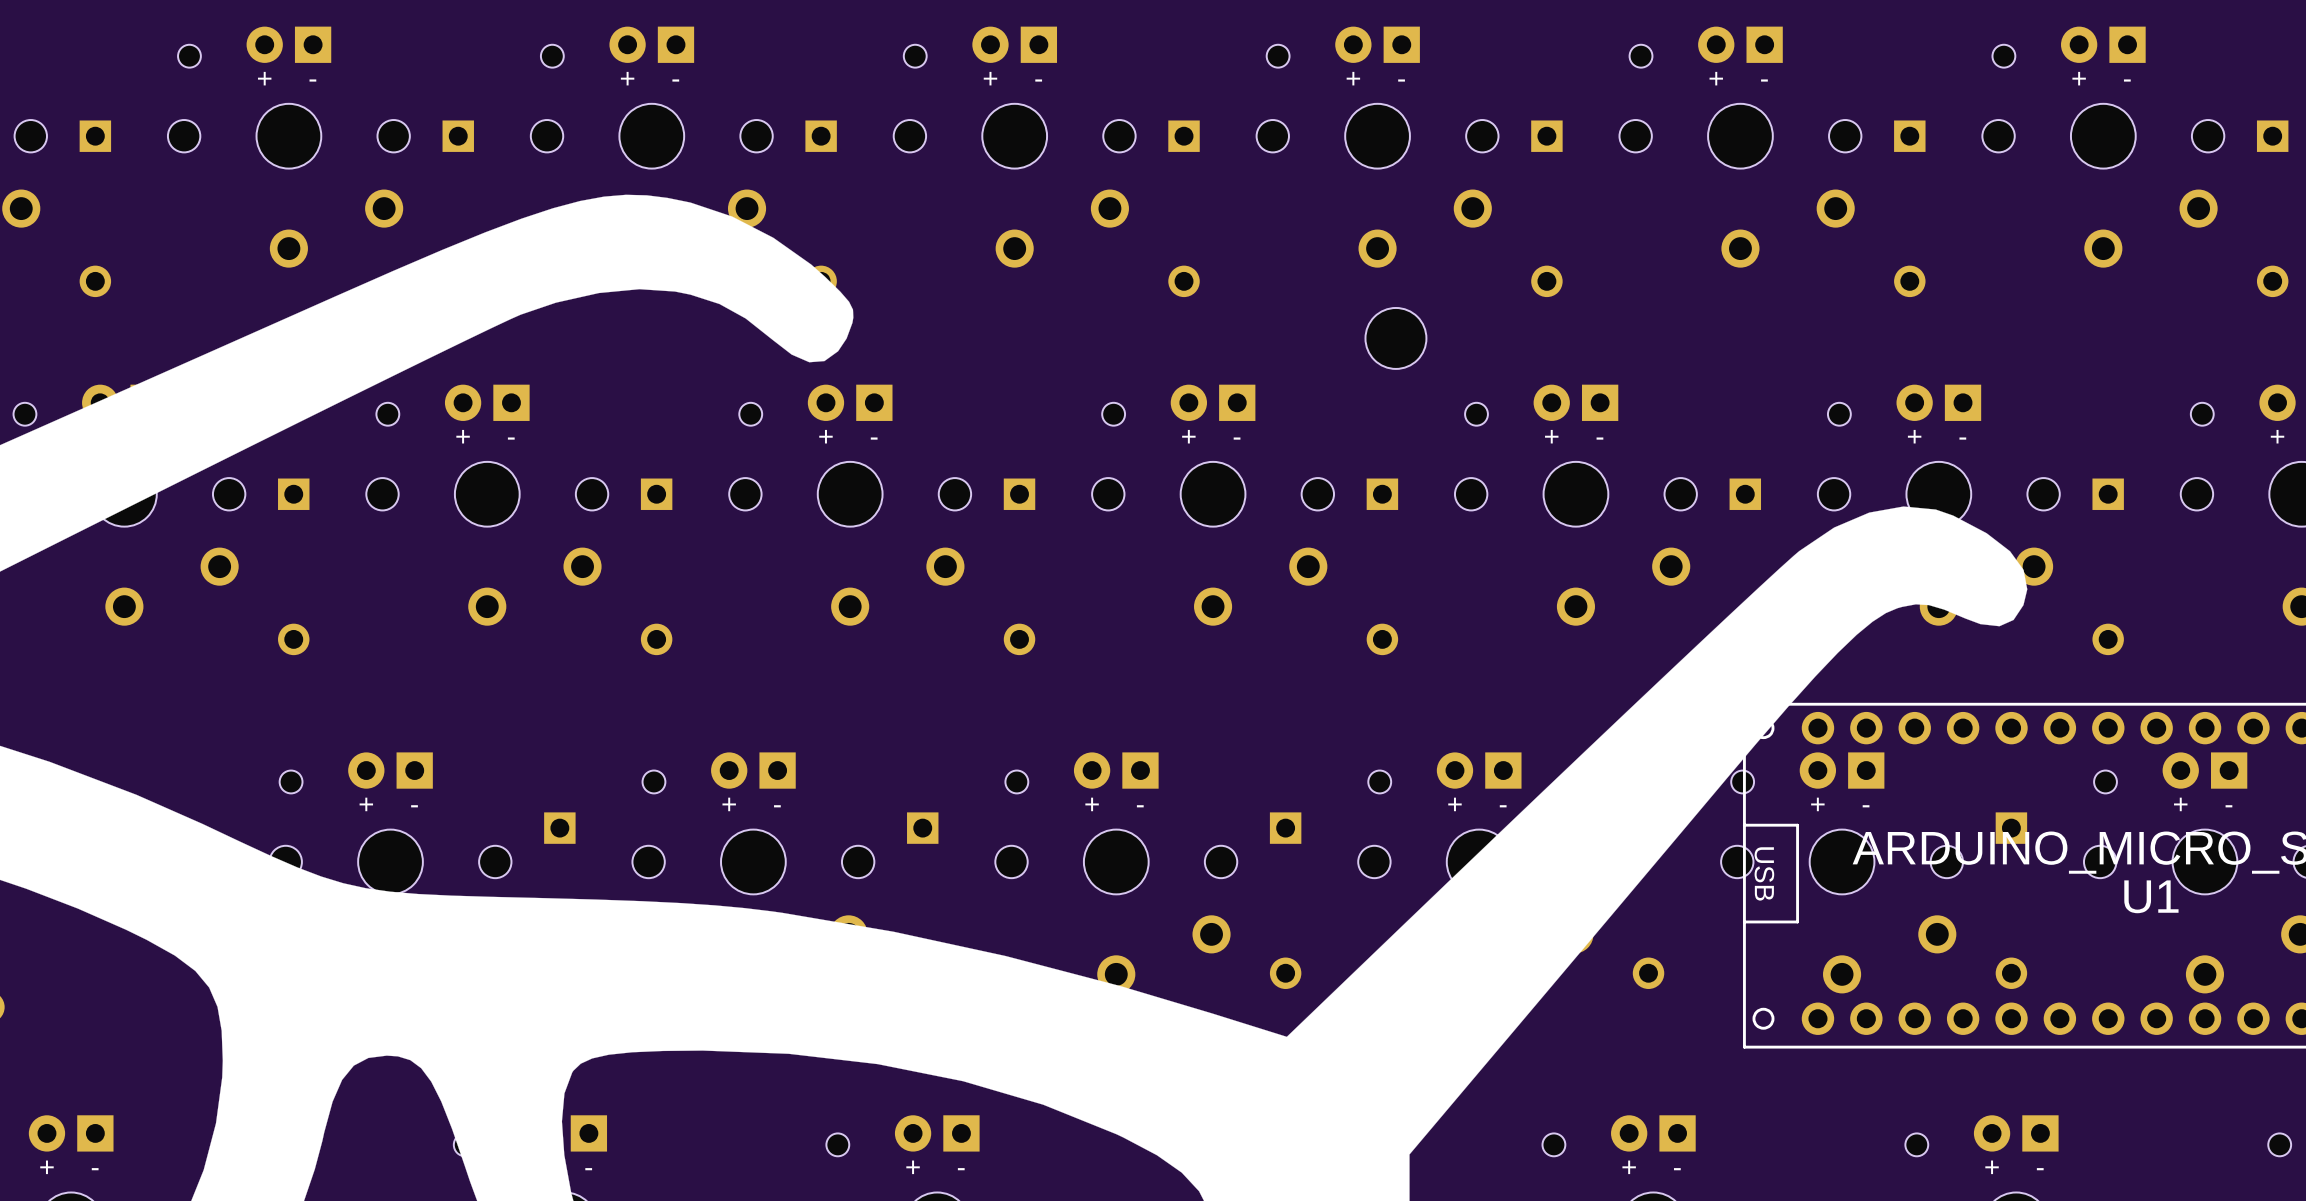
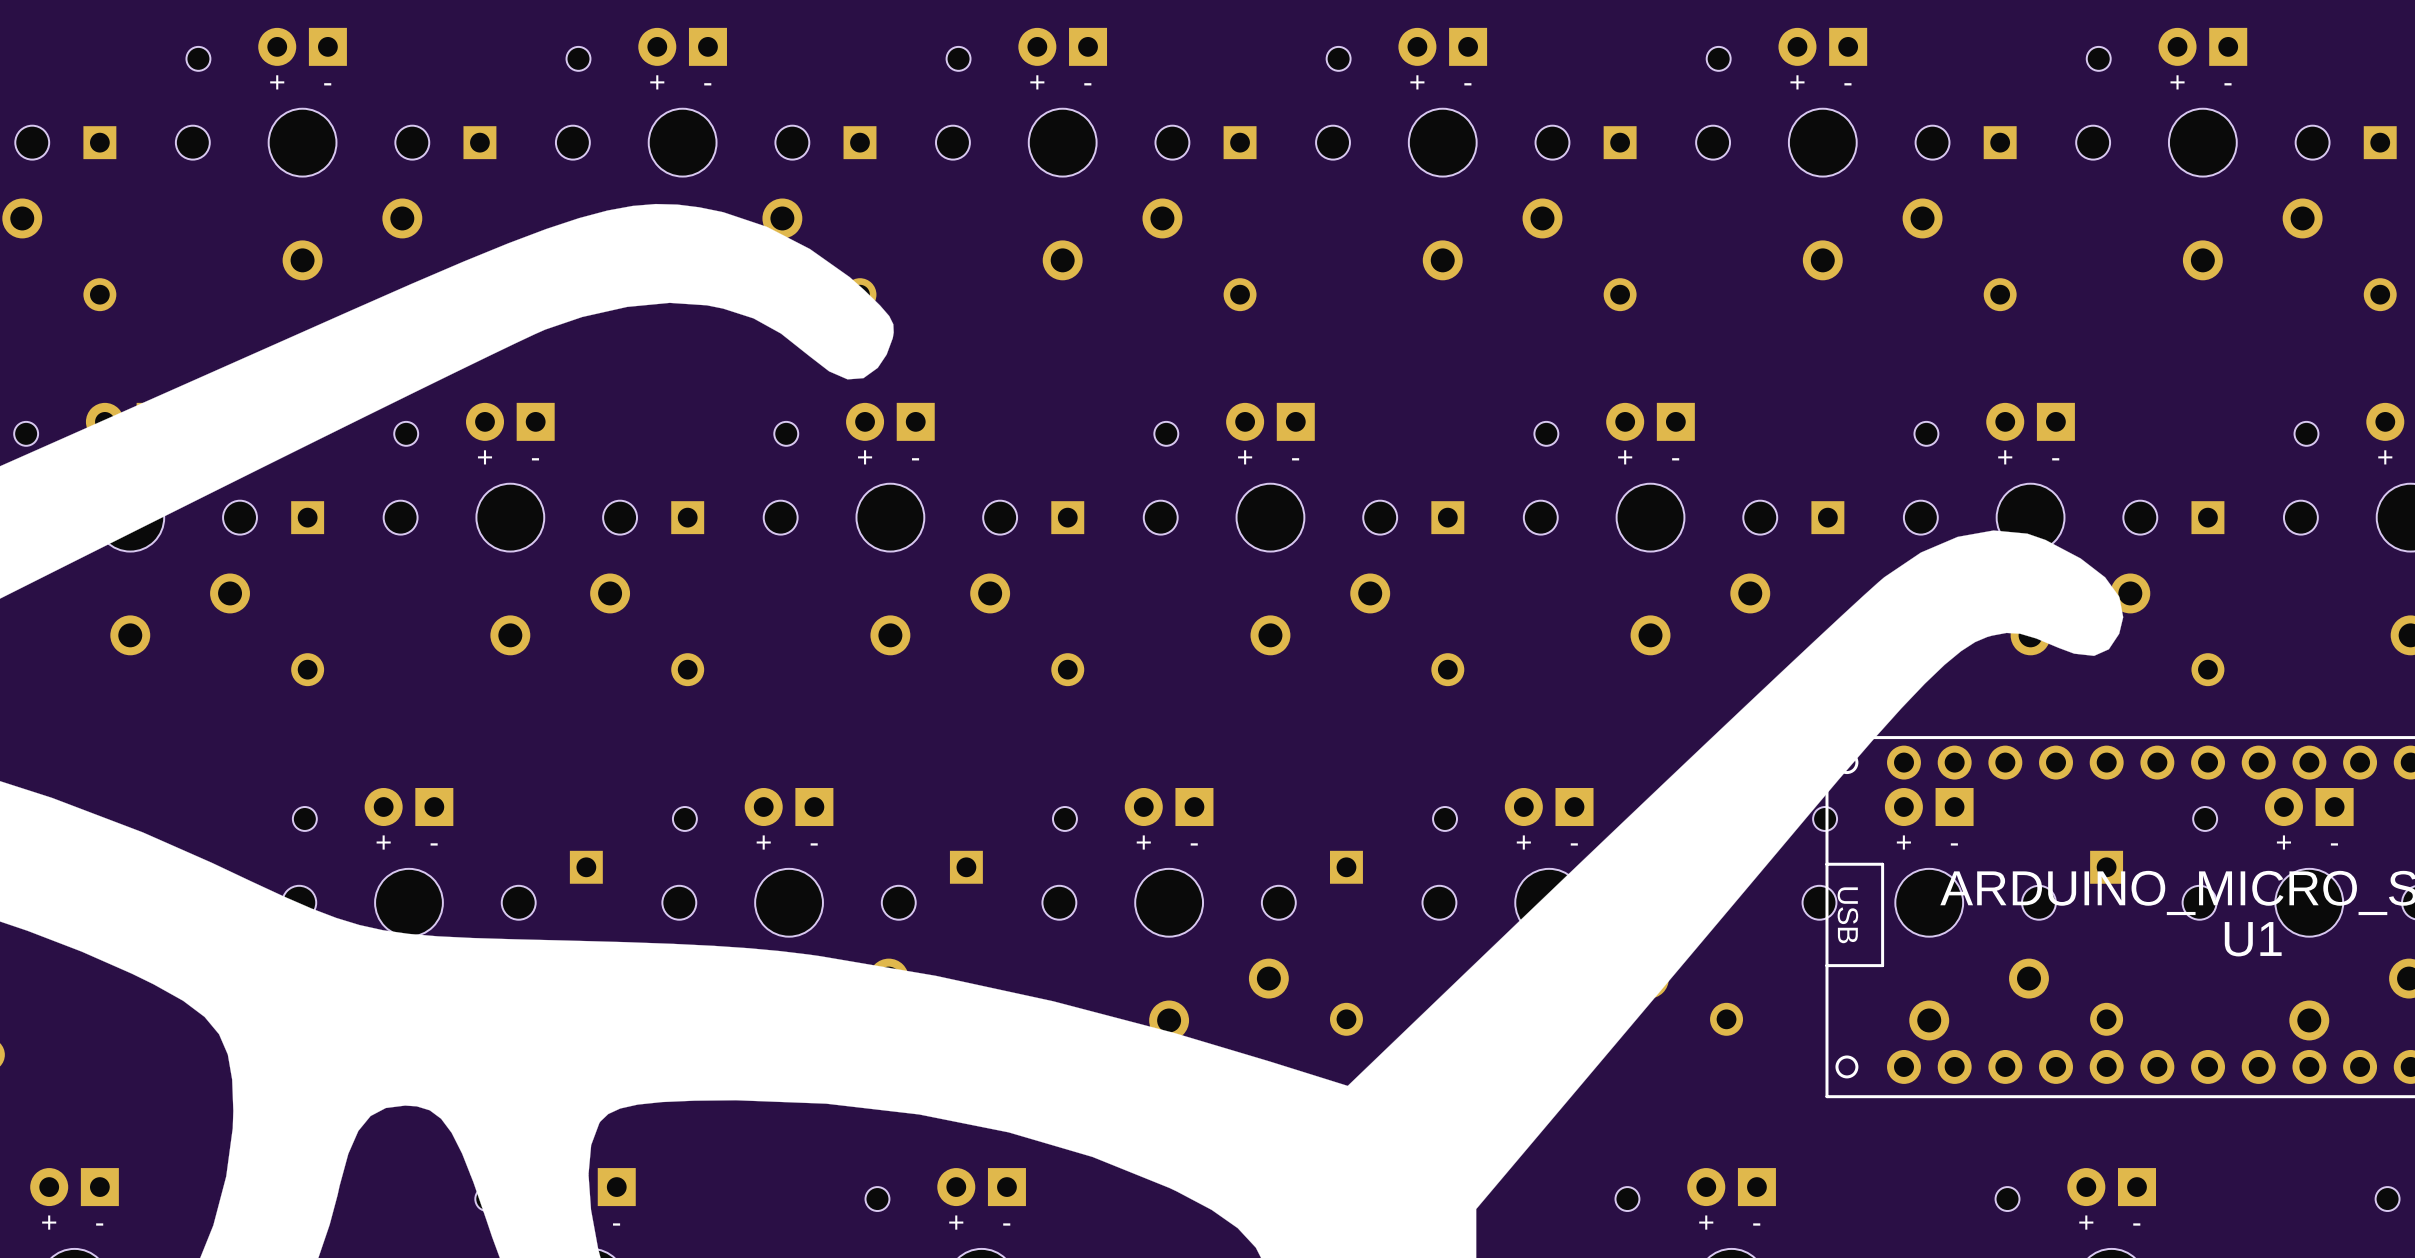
part: (1395, 338) -> none

